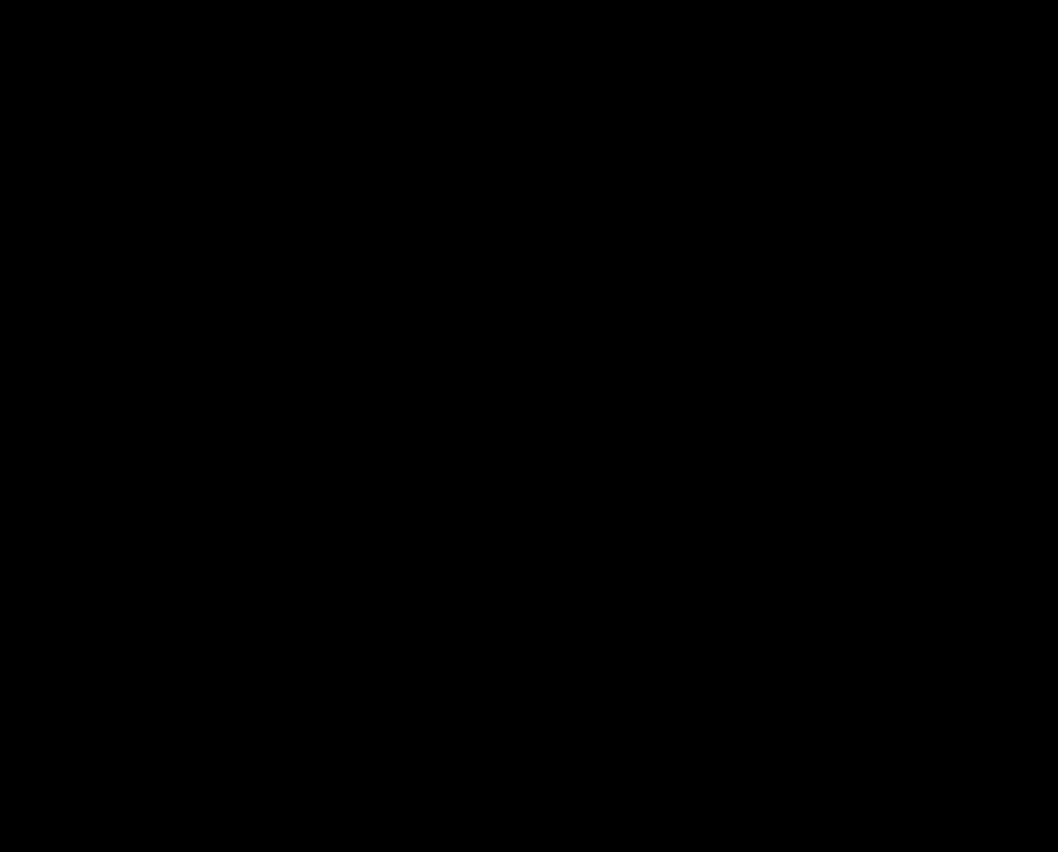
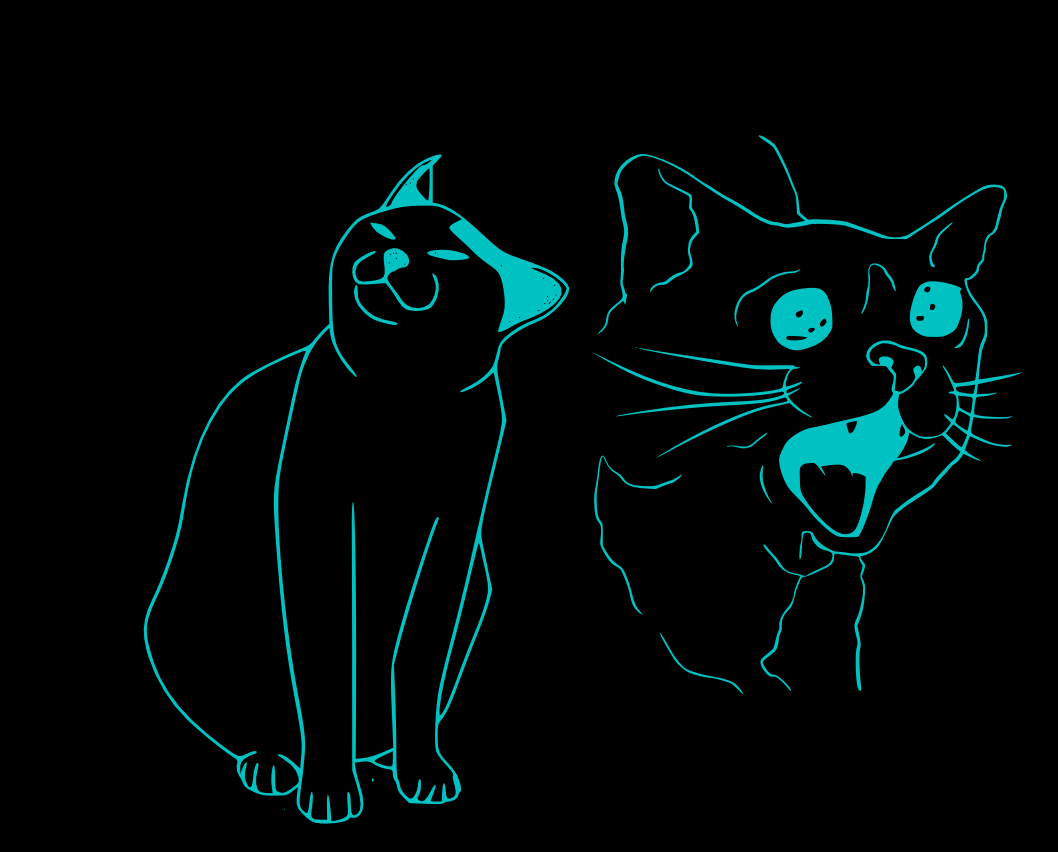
drawing: none -> [143, 135, 1022, 824]

